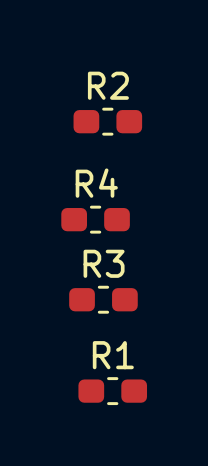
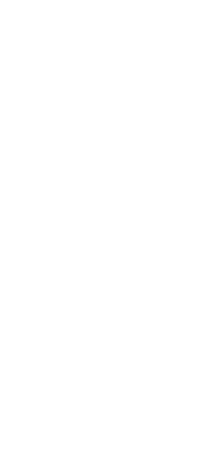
R2: (107, 121) -> none
R4: (95, 219) -> none
R3: (103, 299) -> none
R1: (112, 391) -> none

